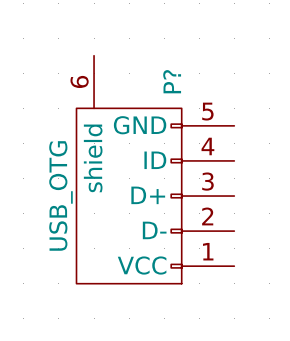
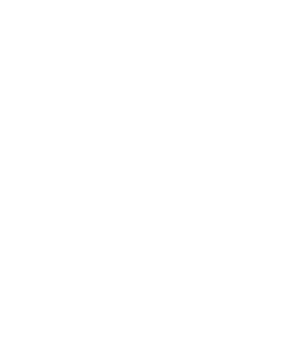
P?: USB_OTG (155, 169) -> none

